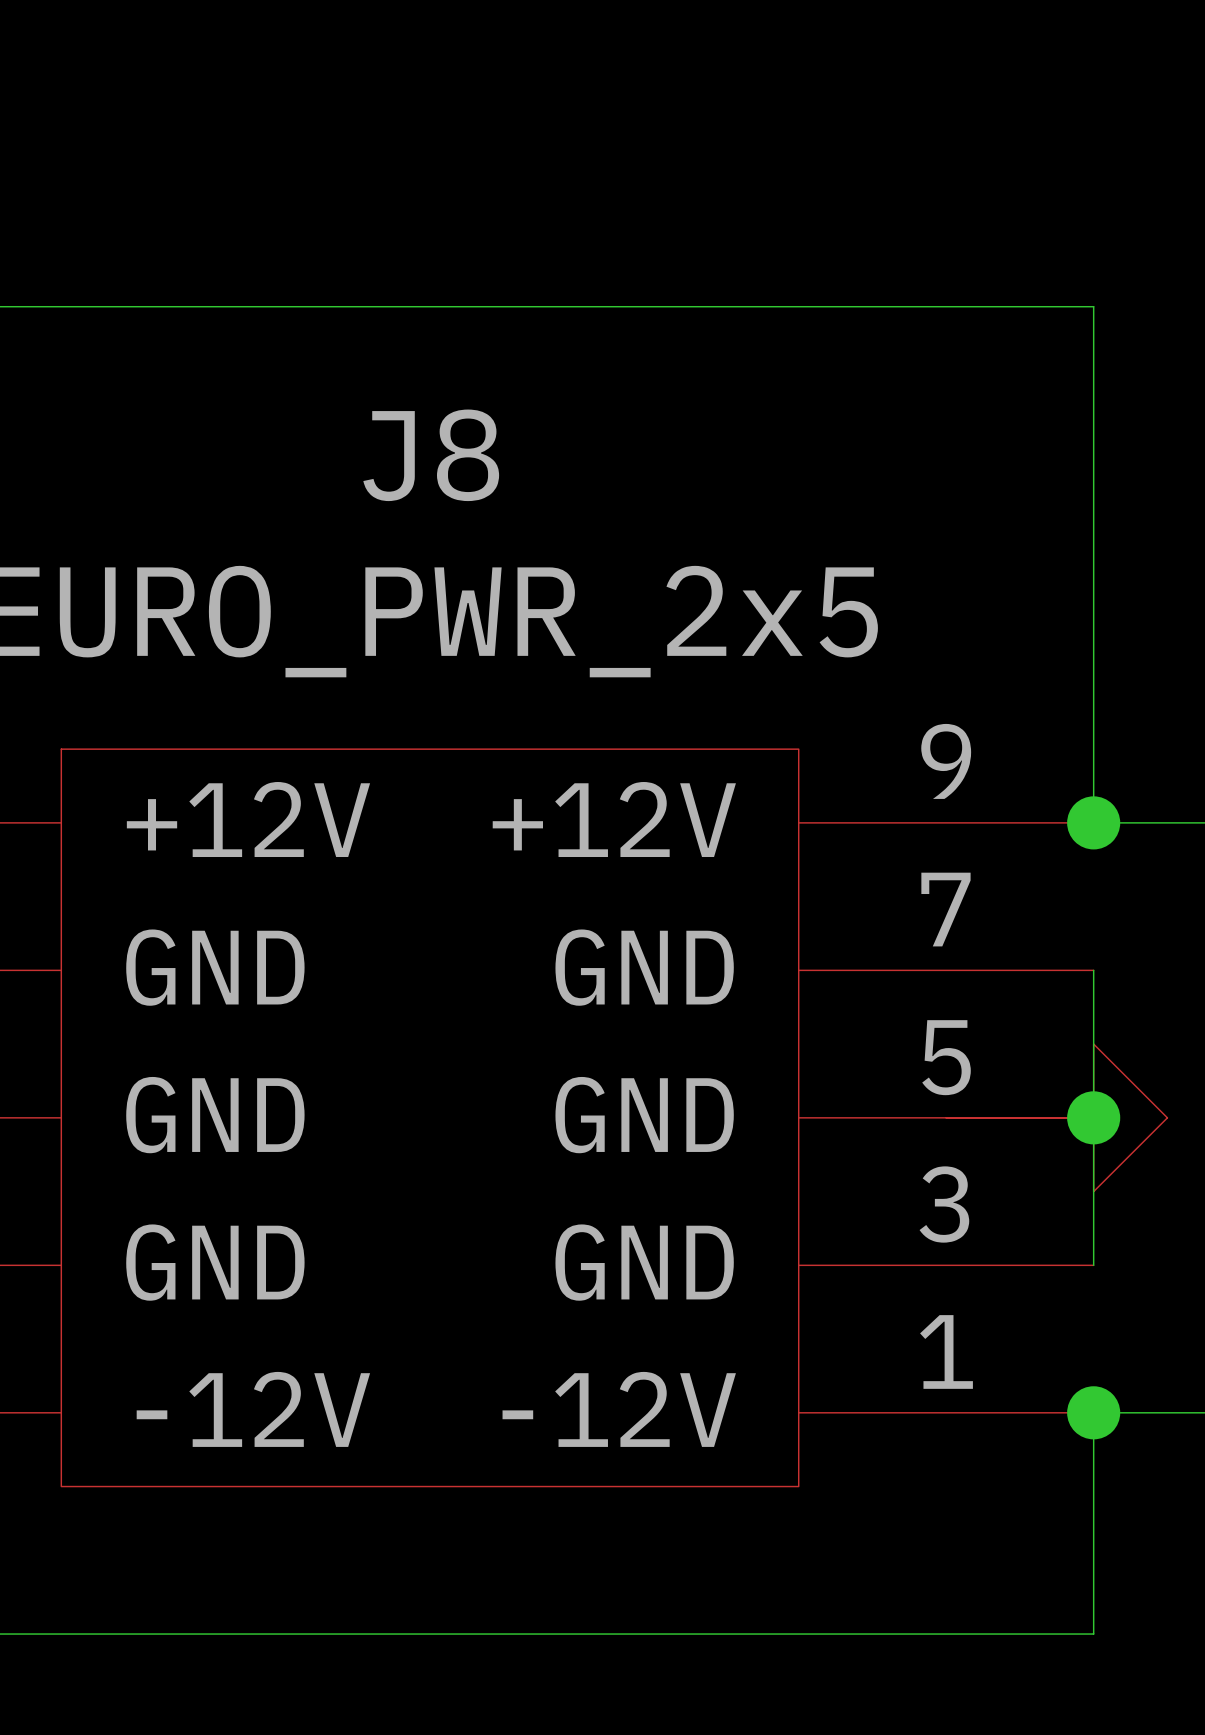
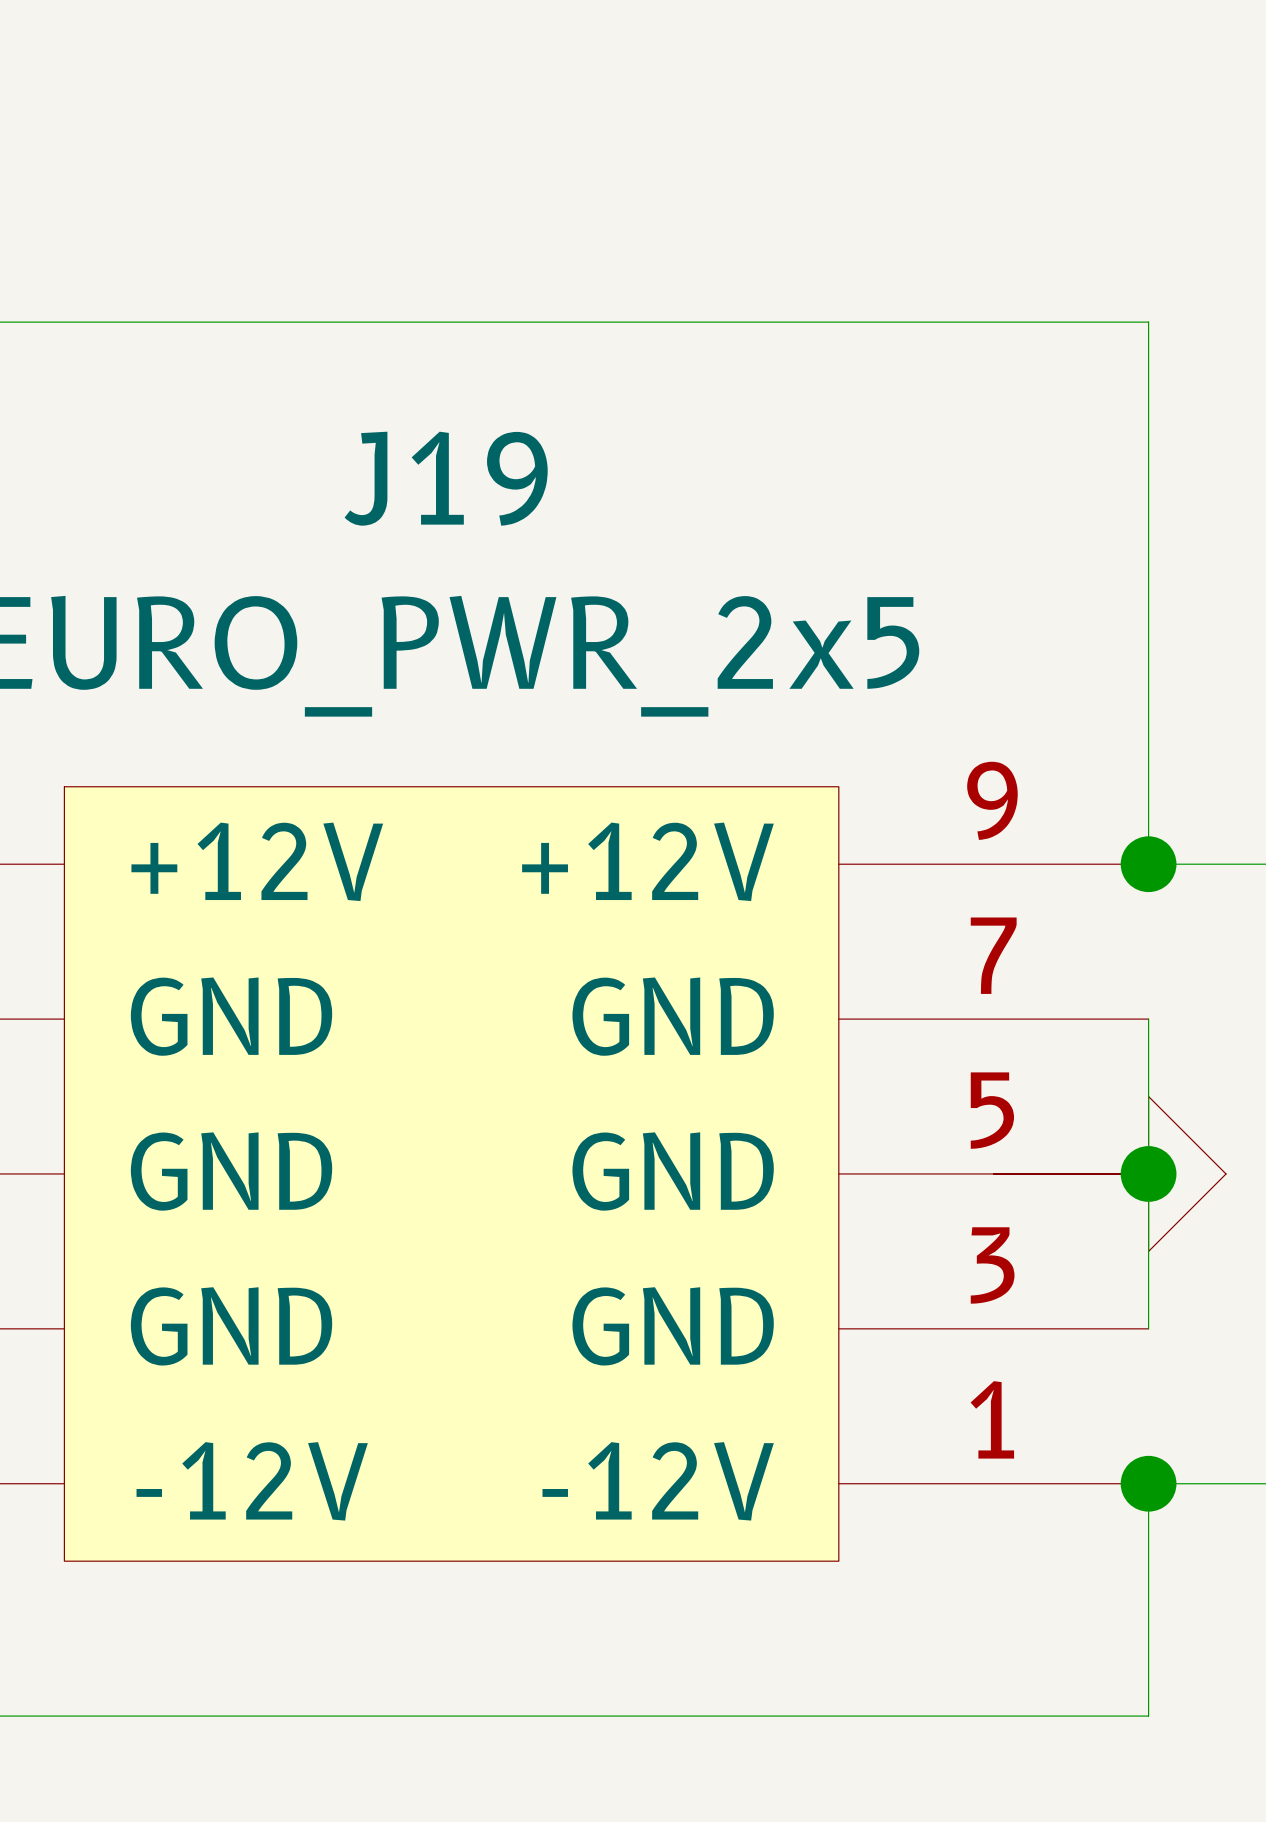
J8 name: J8 (431, 455) -> J19 (446, 478)

